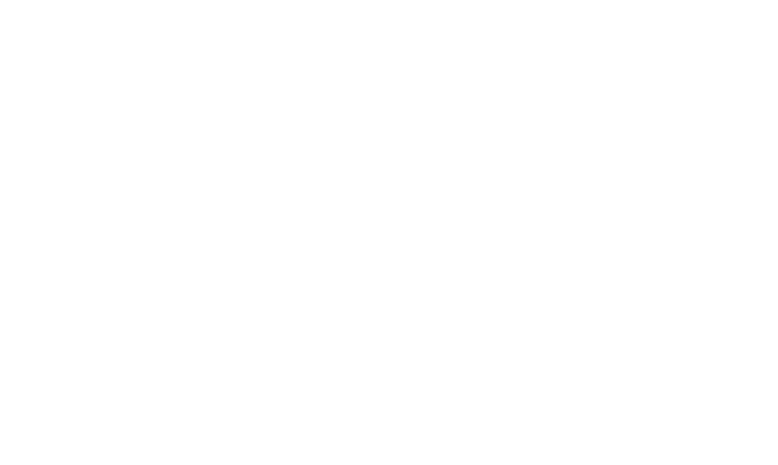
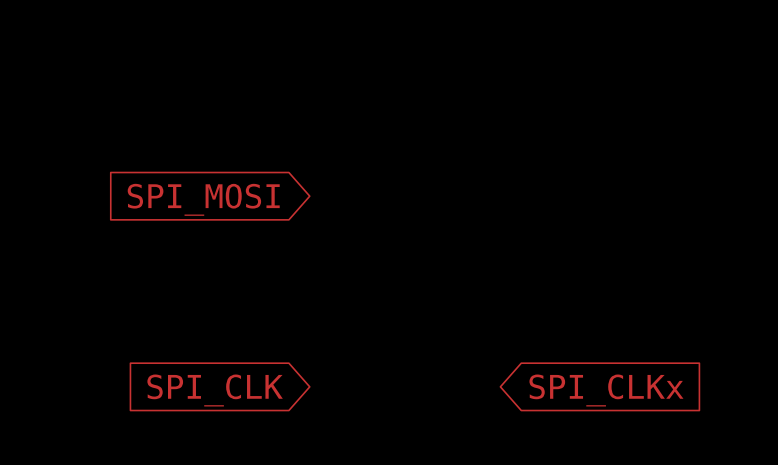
global label: none -> SPI_MOSI (203, 199)
global label: none -> SPI_CLK (215, 390)
global label: none -> SPI_CLKx (606, 390)

